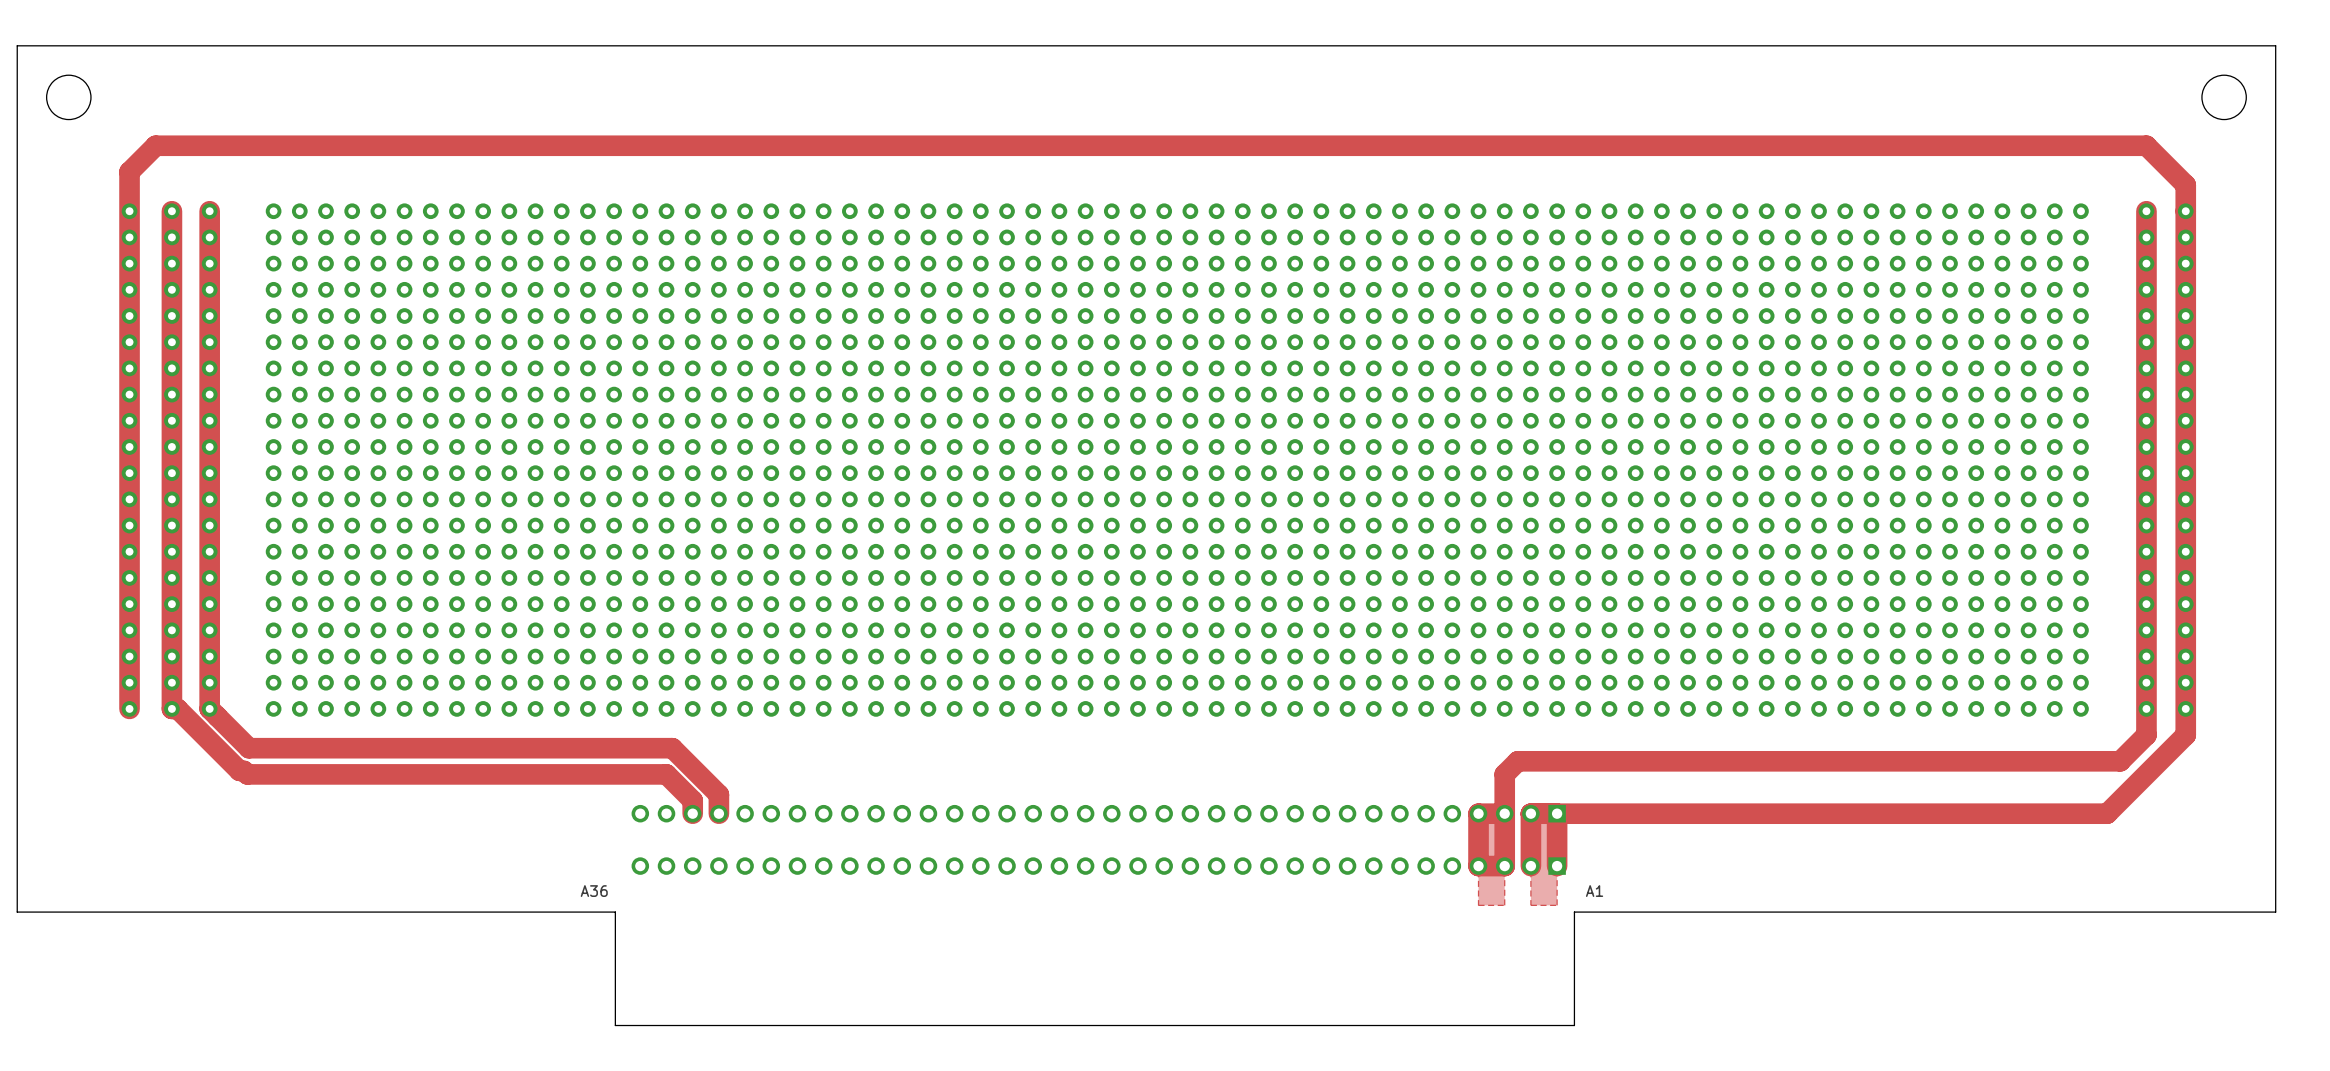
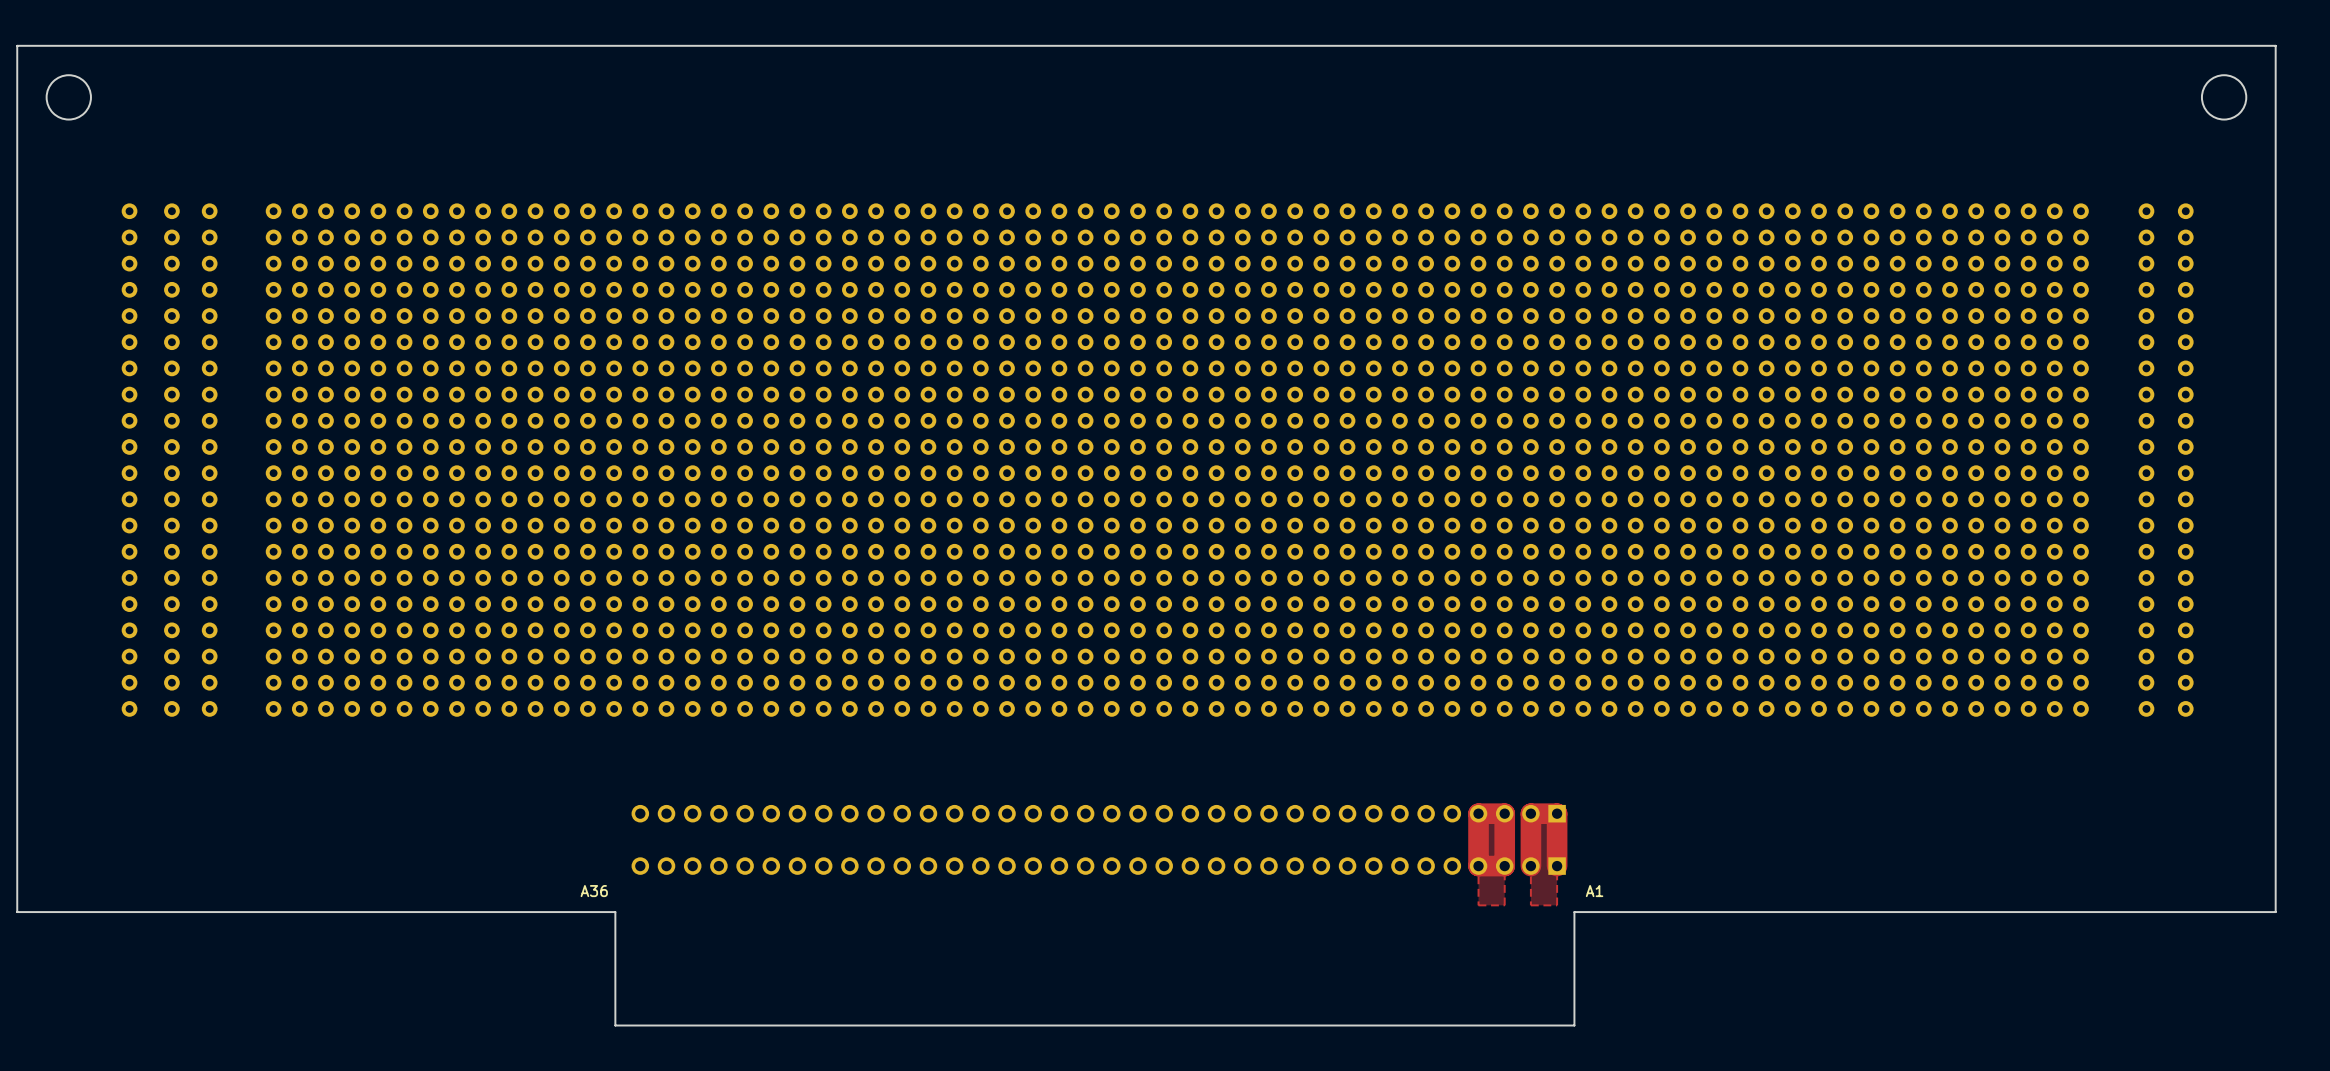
top track: (171, 211) (171, 708) (177, 708) (239, 770) (243, 770) (247, 774) (666, 774) (692, 800) (692, 813) -> none
top track: (209, 211) (209, 708) (248, 748) (672, 748) (718, 794) (718, 813) -> none
top track: (2146, 211) (2146, 735) (2120, 761) (1517, 761) (1504, 774) (1504, 813) -> none
top track: (129, 708) (129, 171) (155, 145) (2146, 145) (2185, 185) (2185, 735) (2107, 813) (1557, 813) -> none

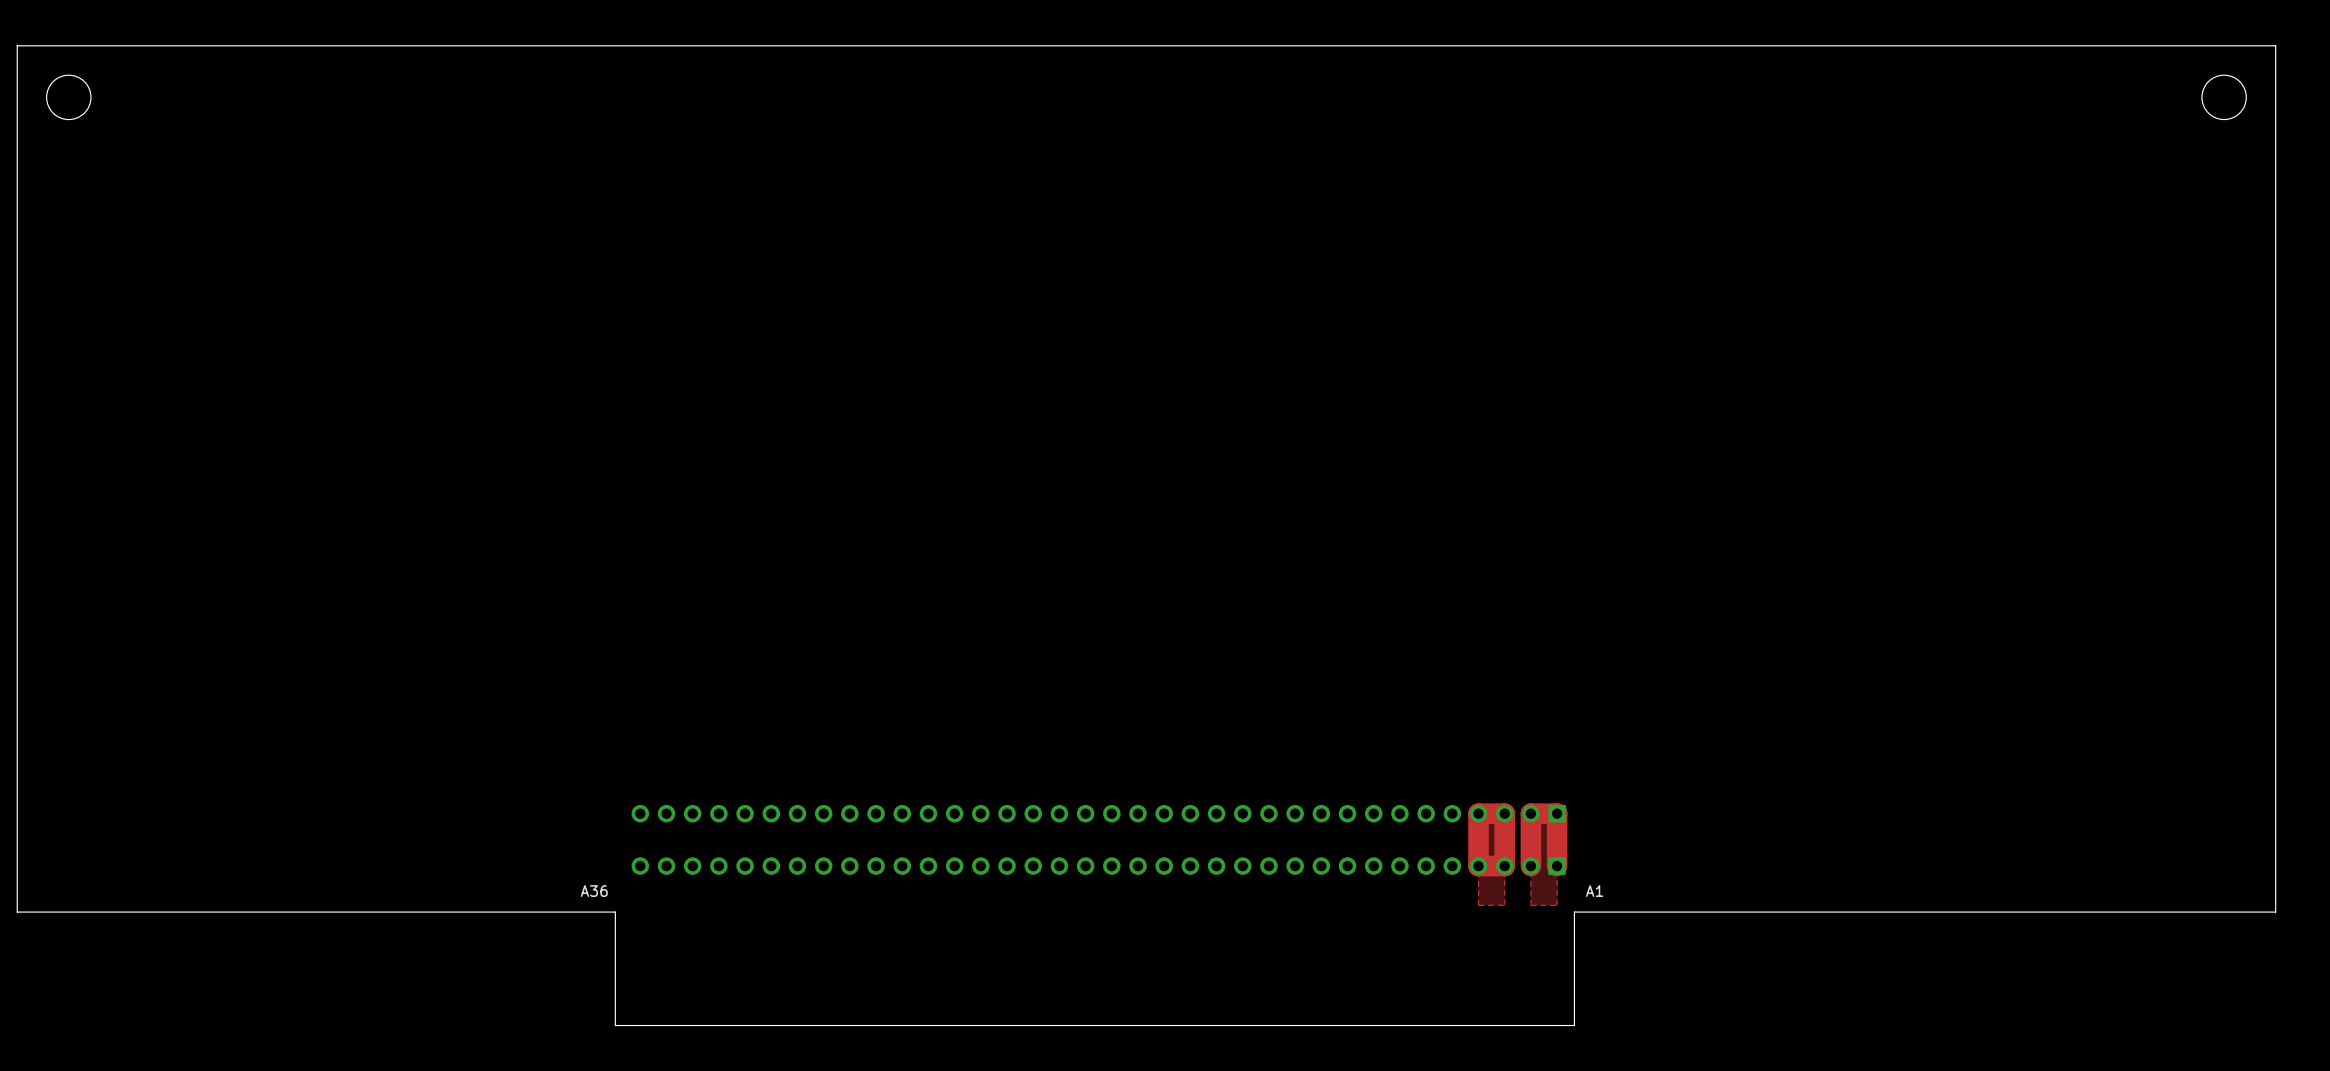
part: (129, 460) -> none
part: (171, 460) -> none
part: (209, 460) -> none
part: (1177, 460) -> none
part: (2146, 460) -> none
part: (2185, 460) -> none

